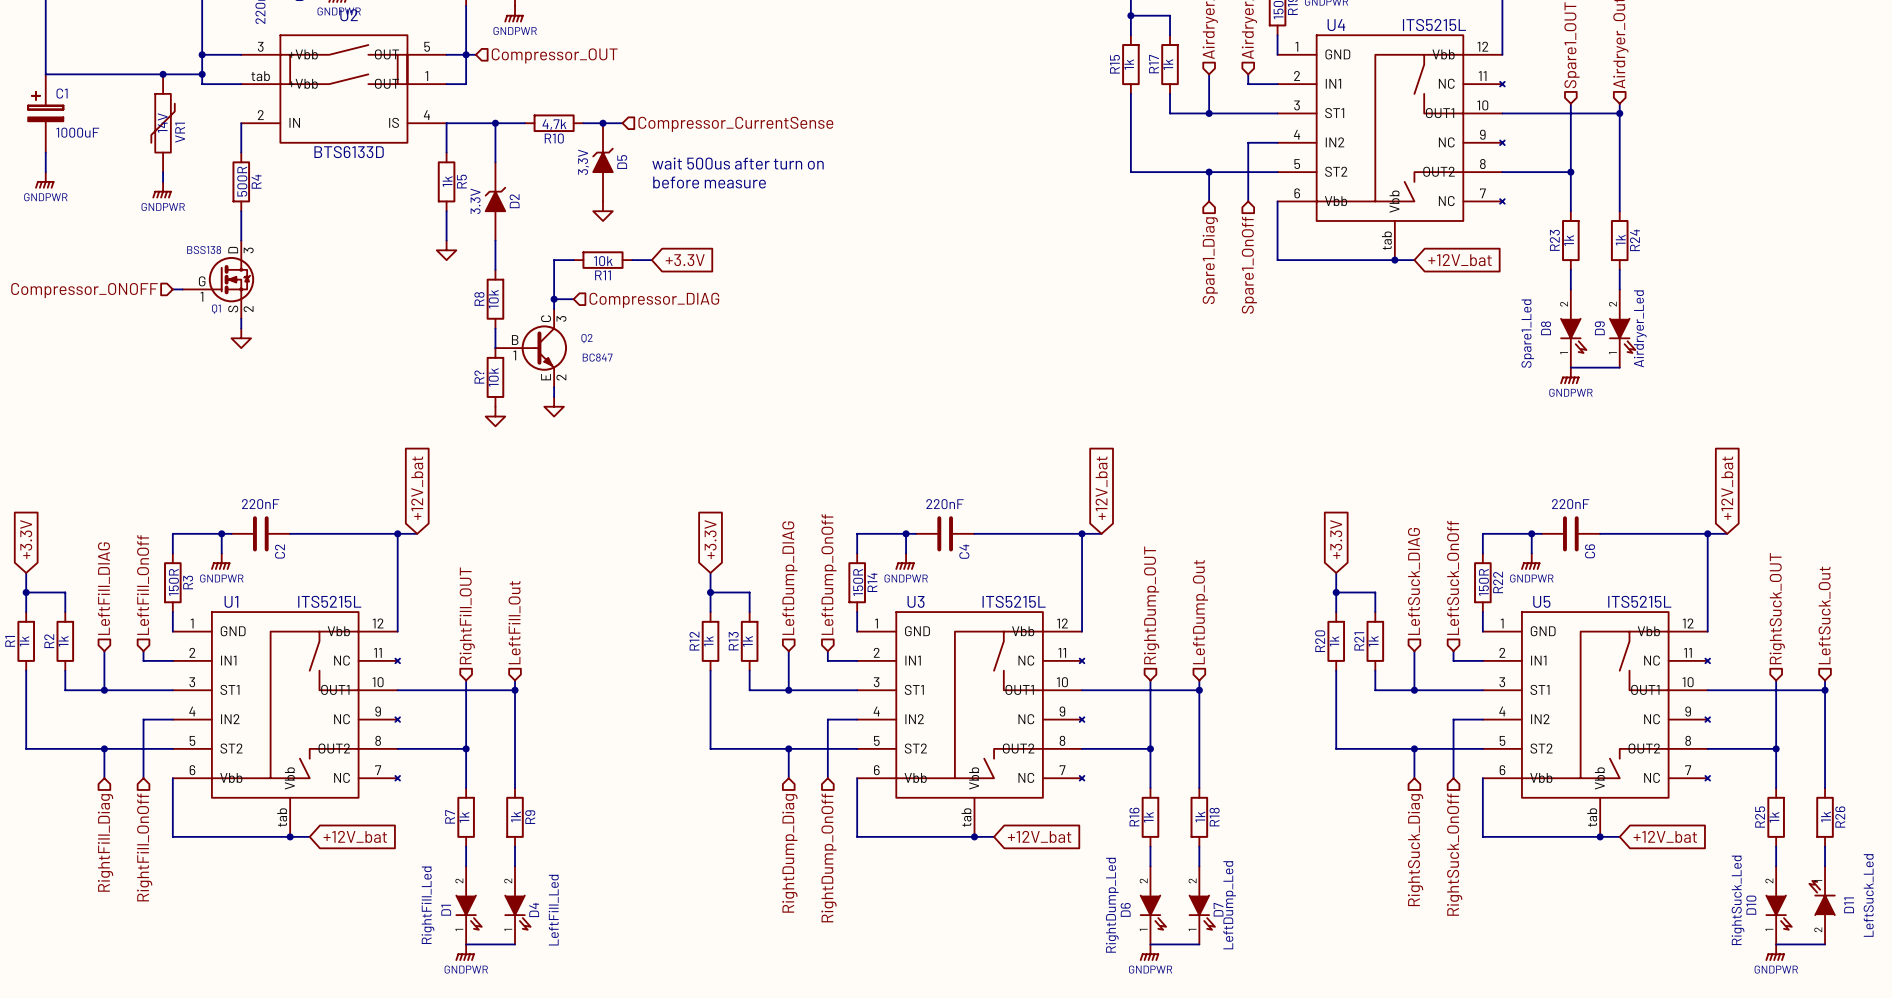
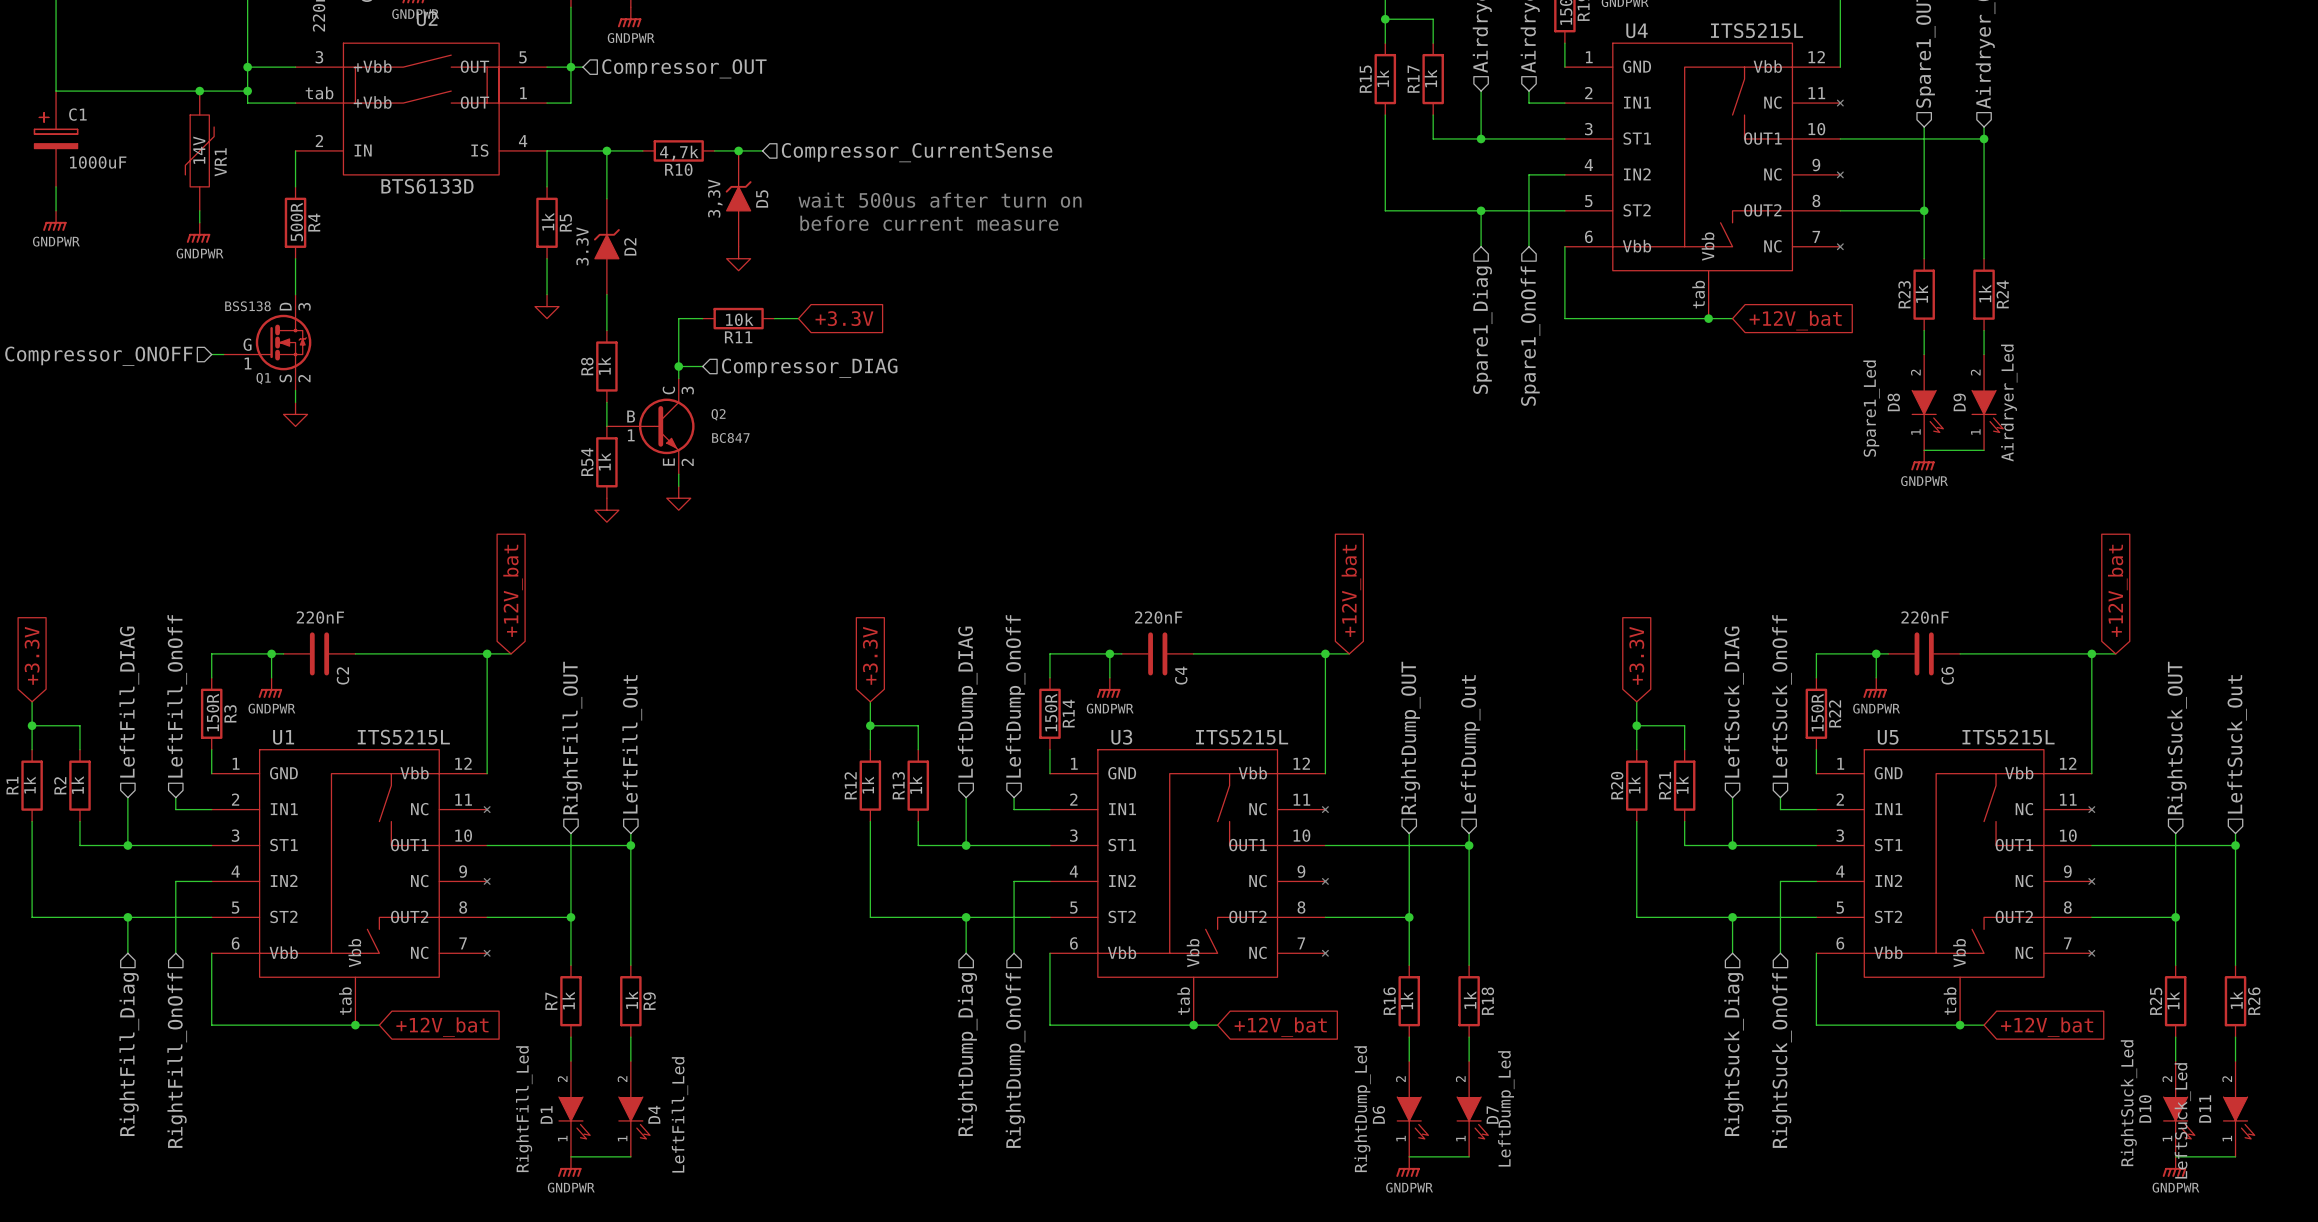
text: before measure (709, 182) -> before current measure (929, 223)
R8 value: 10k (493, 299) -> 1k (604, 365)
R? name: R? (479, 377) -> R54 (587, 462)
R? value: 10k (493, 377) -> 1k (604, 461)
D11 rotation: 0° (1822, 898) -> 180° (2239, 1117)

